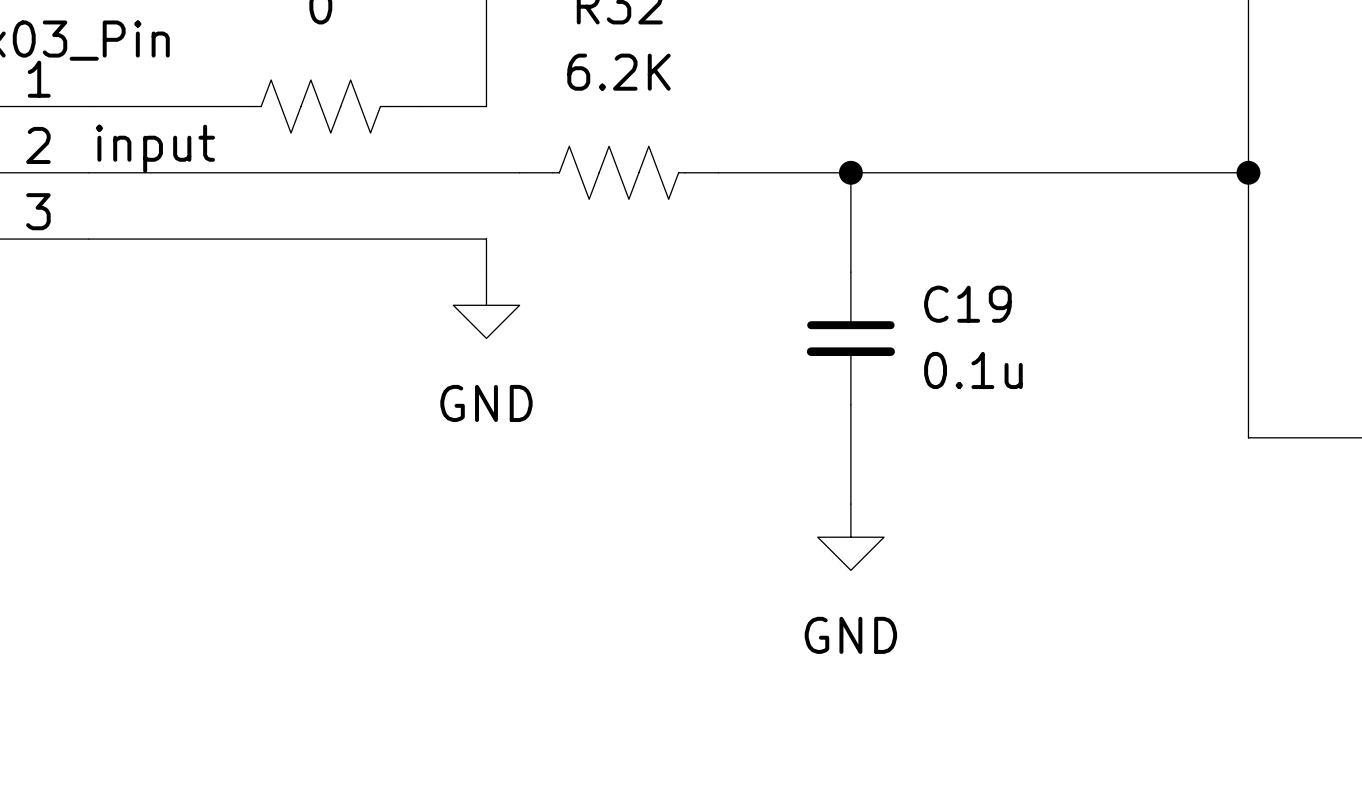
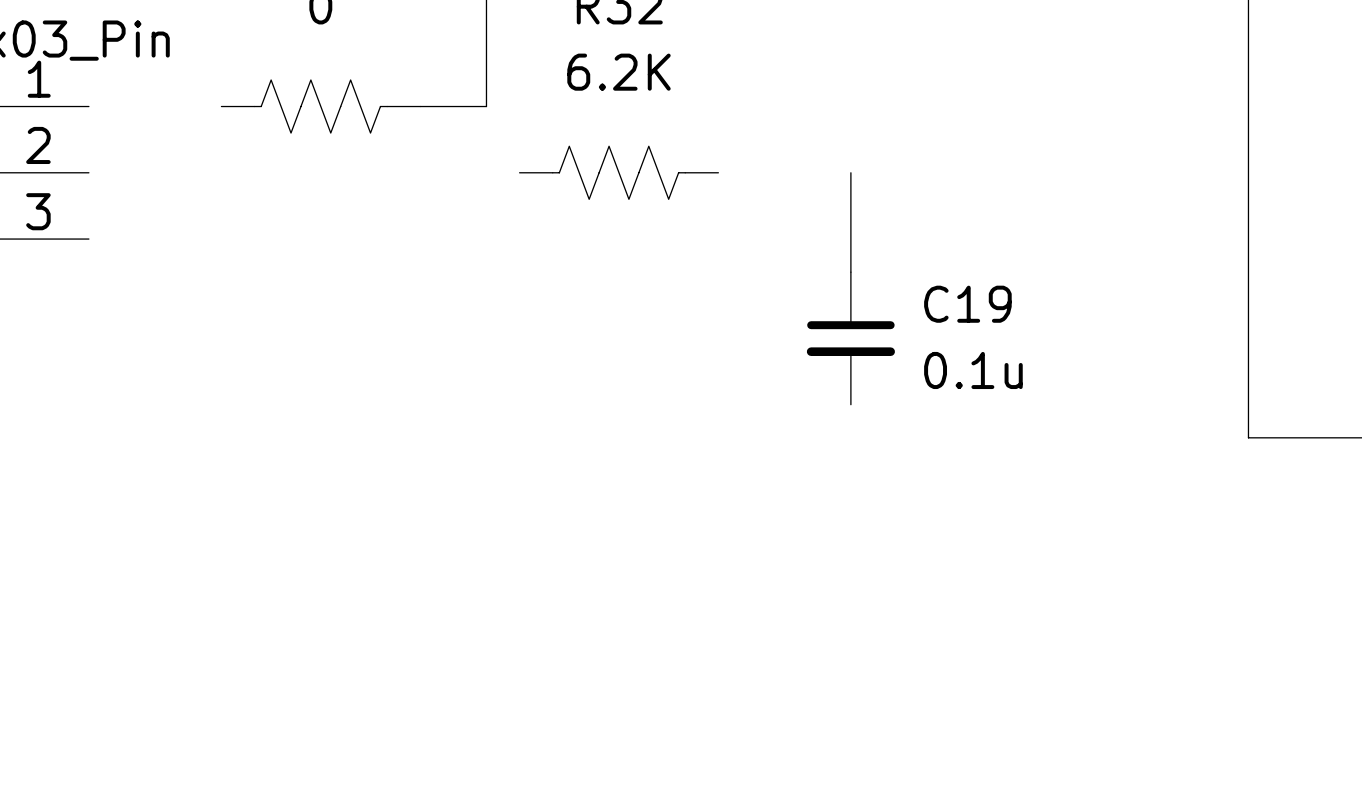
wire: (88, 106) (221, 106) -> none
label: input (155, 148) -> none
wire: (88, 172) (519, 172) -> none
wire: (718, 172) (1248, 172) -> none
junction: (850, 172) -> none
junction: (1248, 172) -> none
wire: (88, 239) (486, 239) (486, 272) -> none
power symbol: GND (486, 305) -> none
wire: (850, 404) (850, 504) -> none
power symbol: GND (850, 537) -> none

